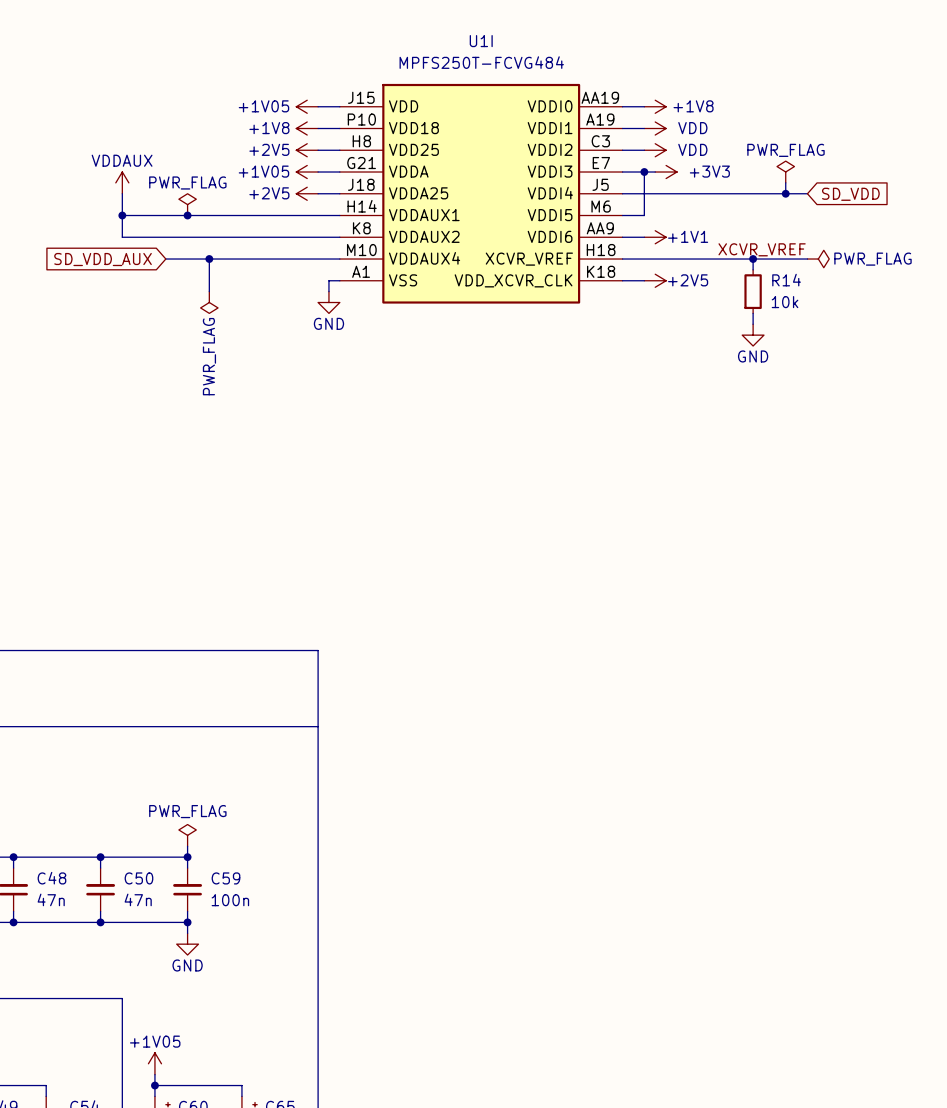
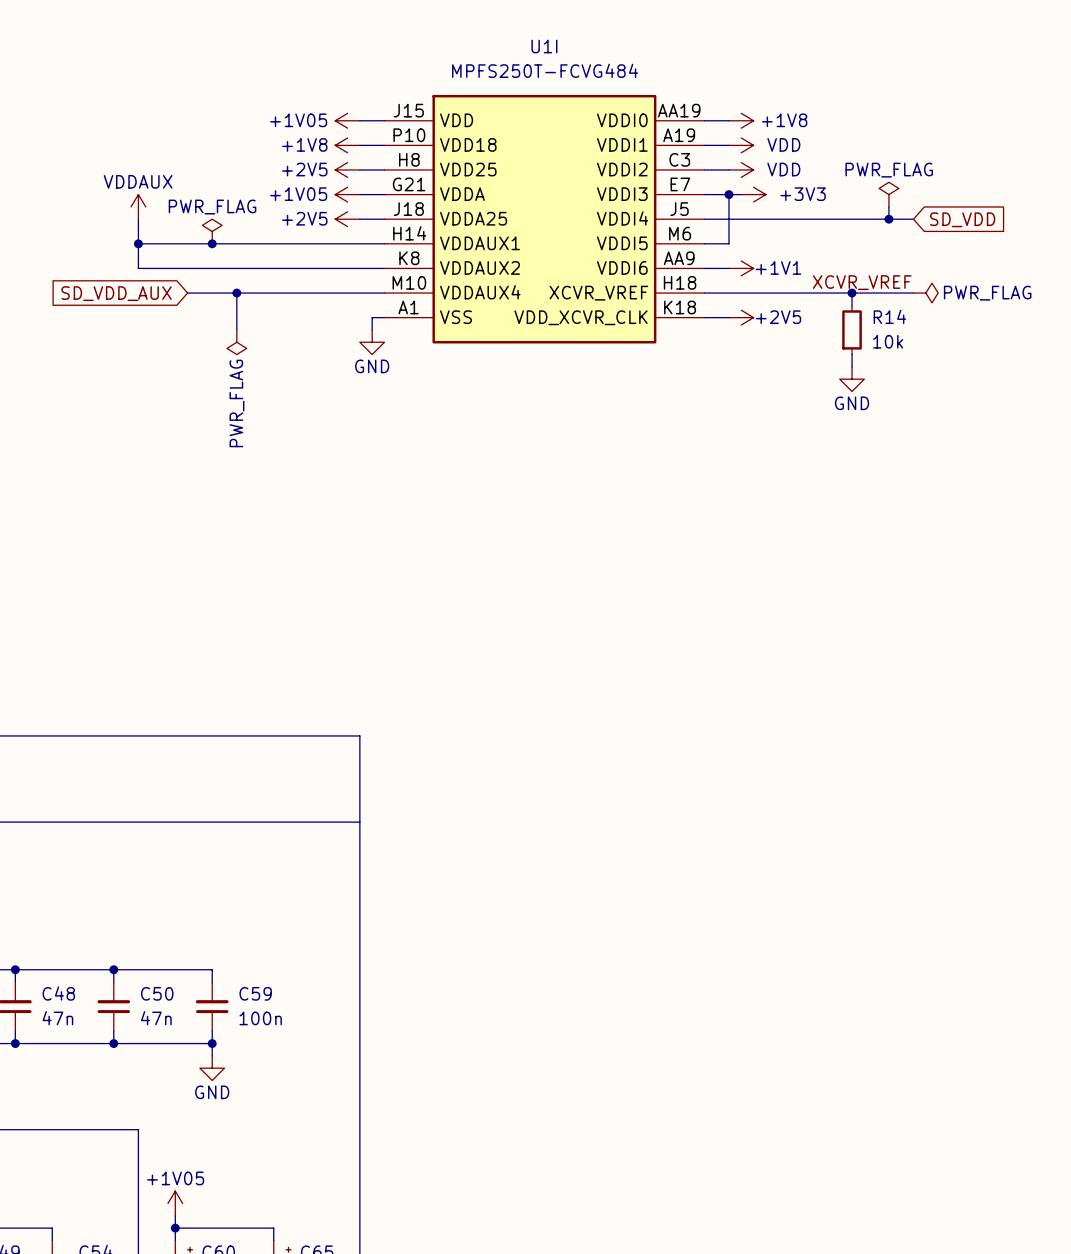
power symbol: PWR_FLAG (187, 835) -> none
wire: (187, 846) (187, 857) -> none
junction: (187, 857) -> none

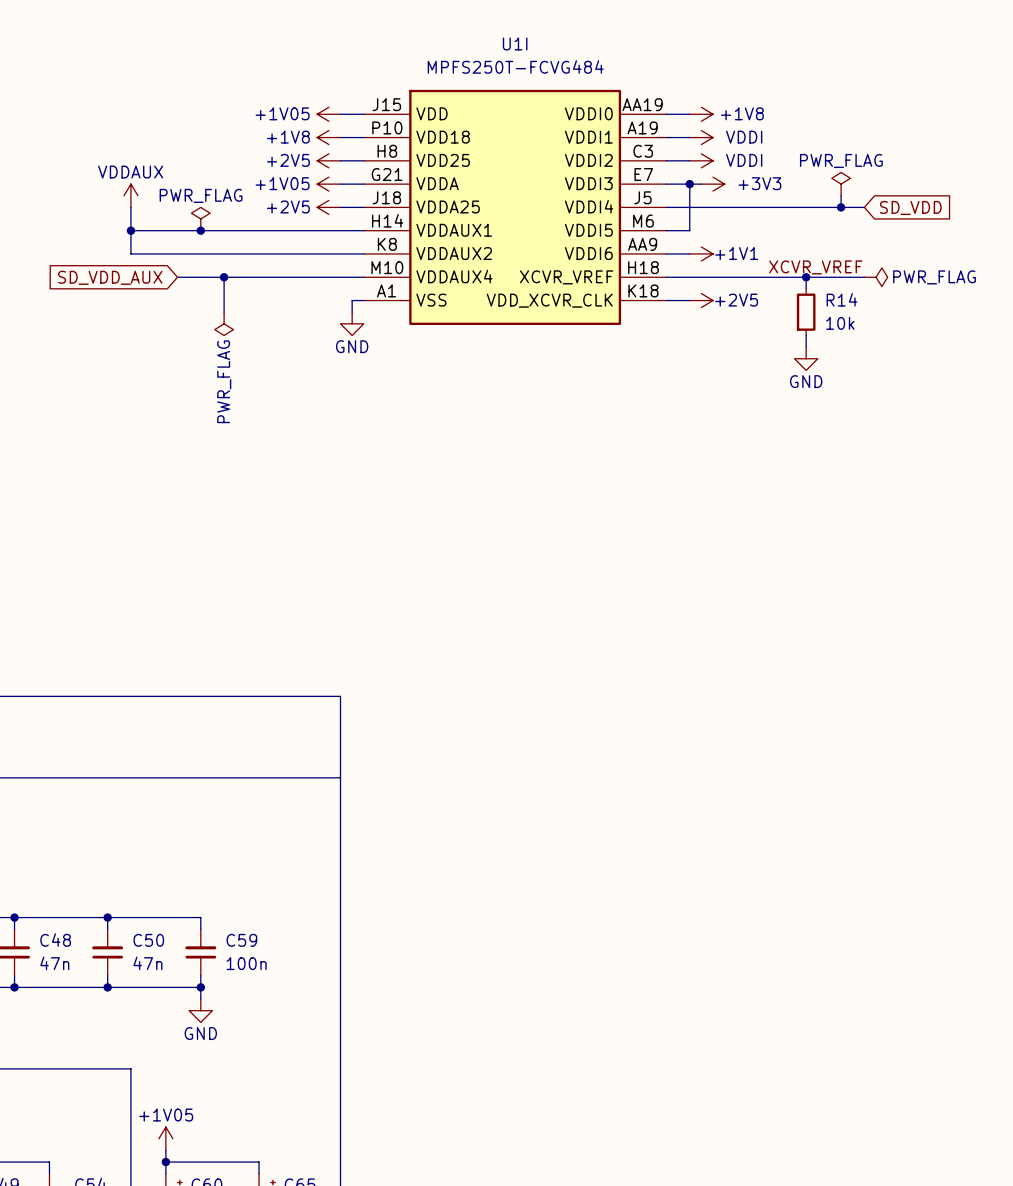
power symbol: VDD (741, 145) -> VDDI (701, 137)
power symbol: VDD (741, 169) -> VDDI (701, 160)

